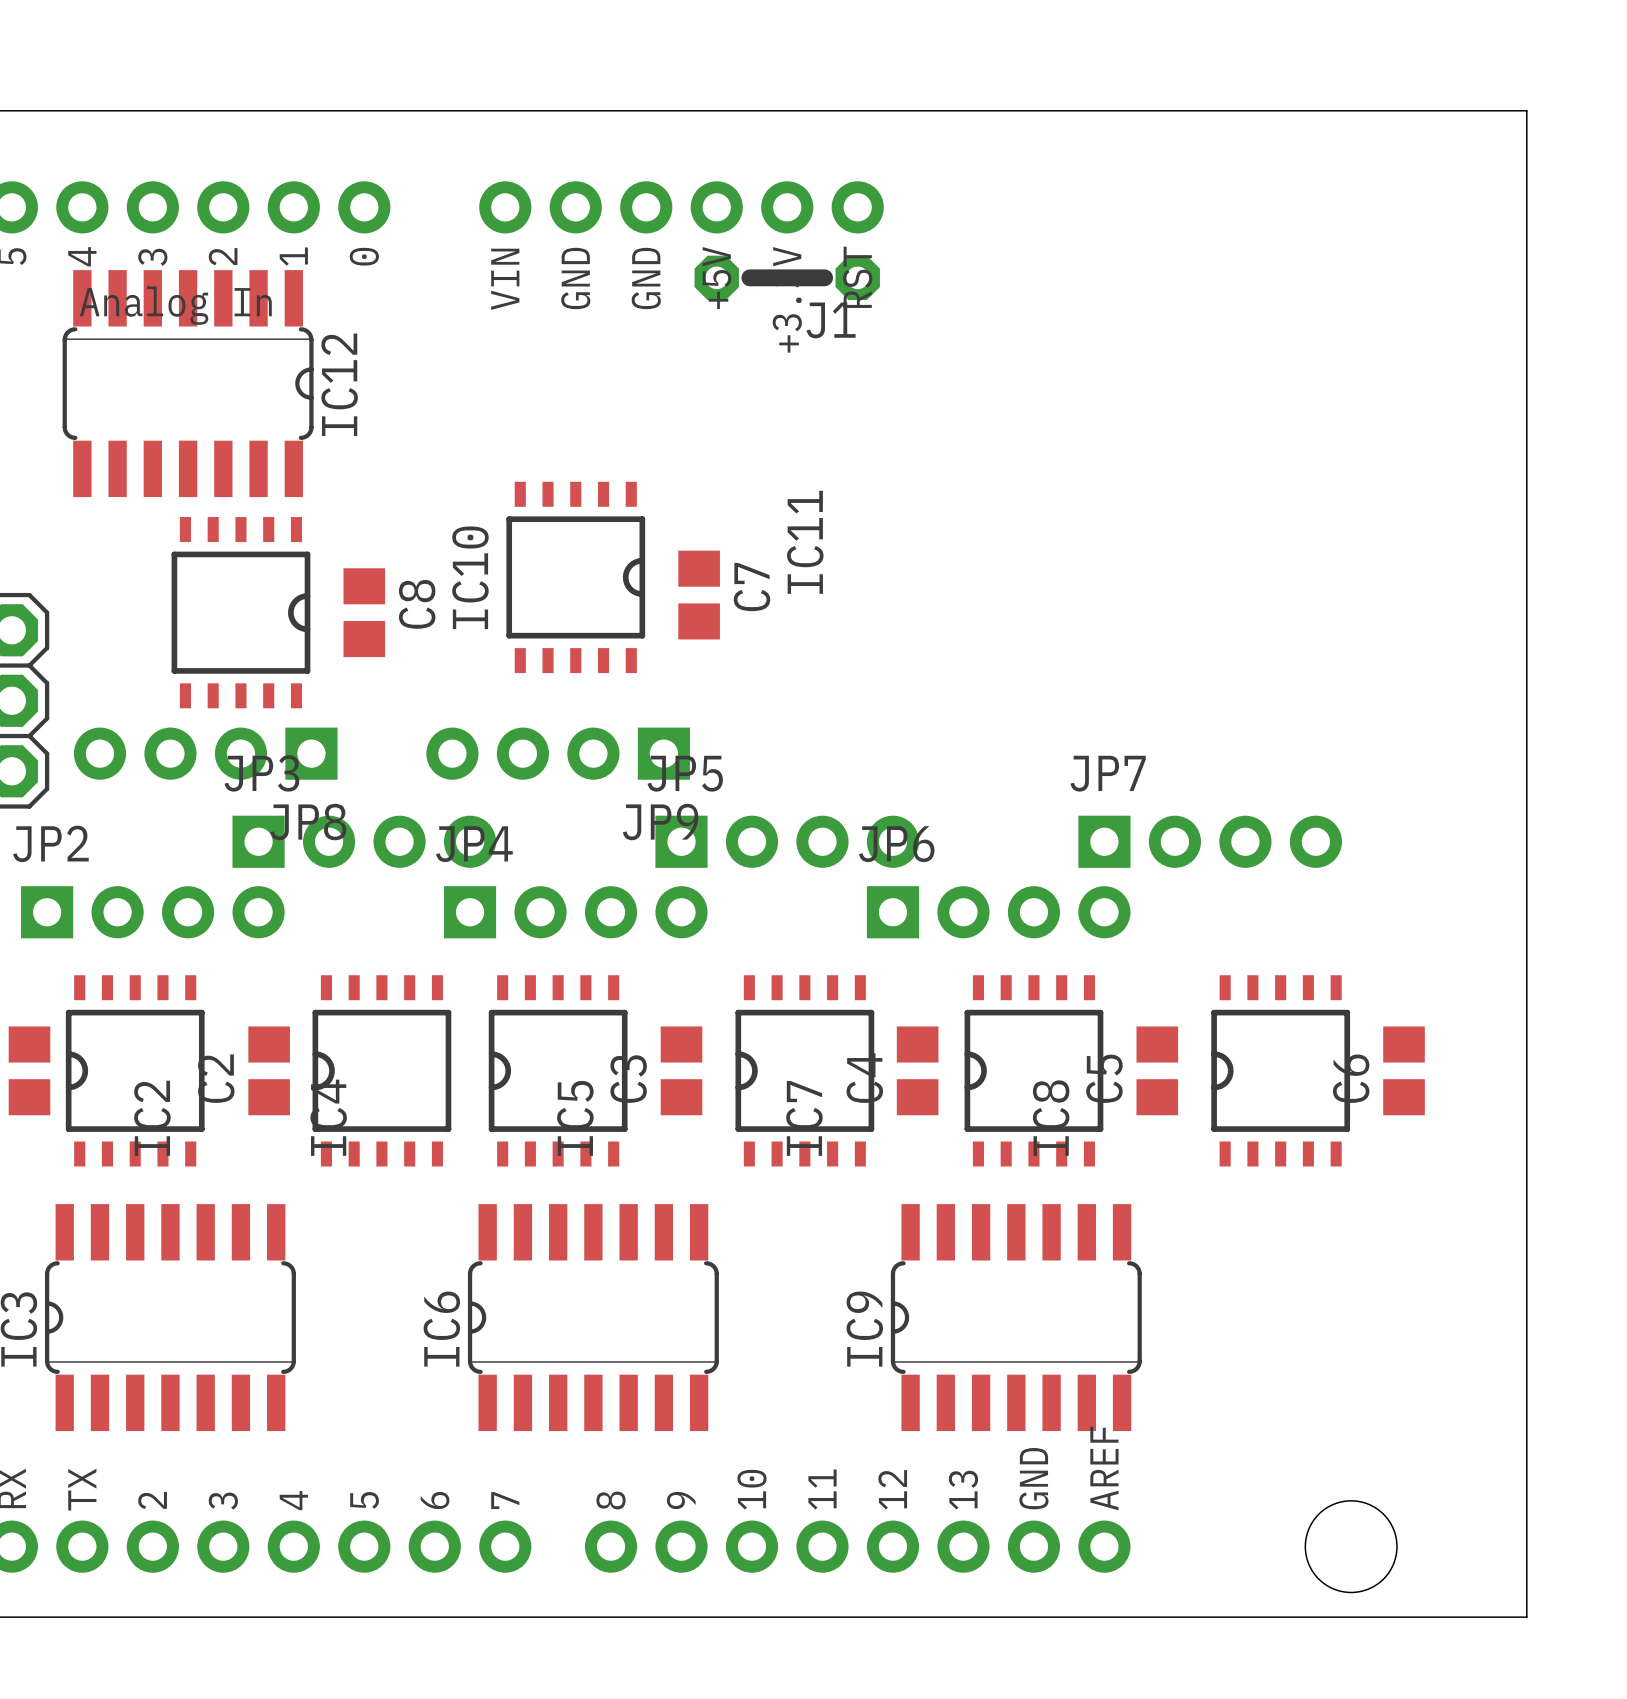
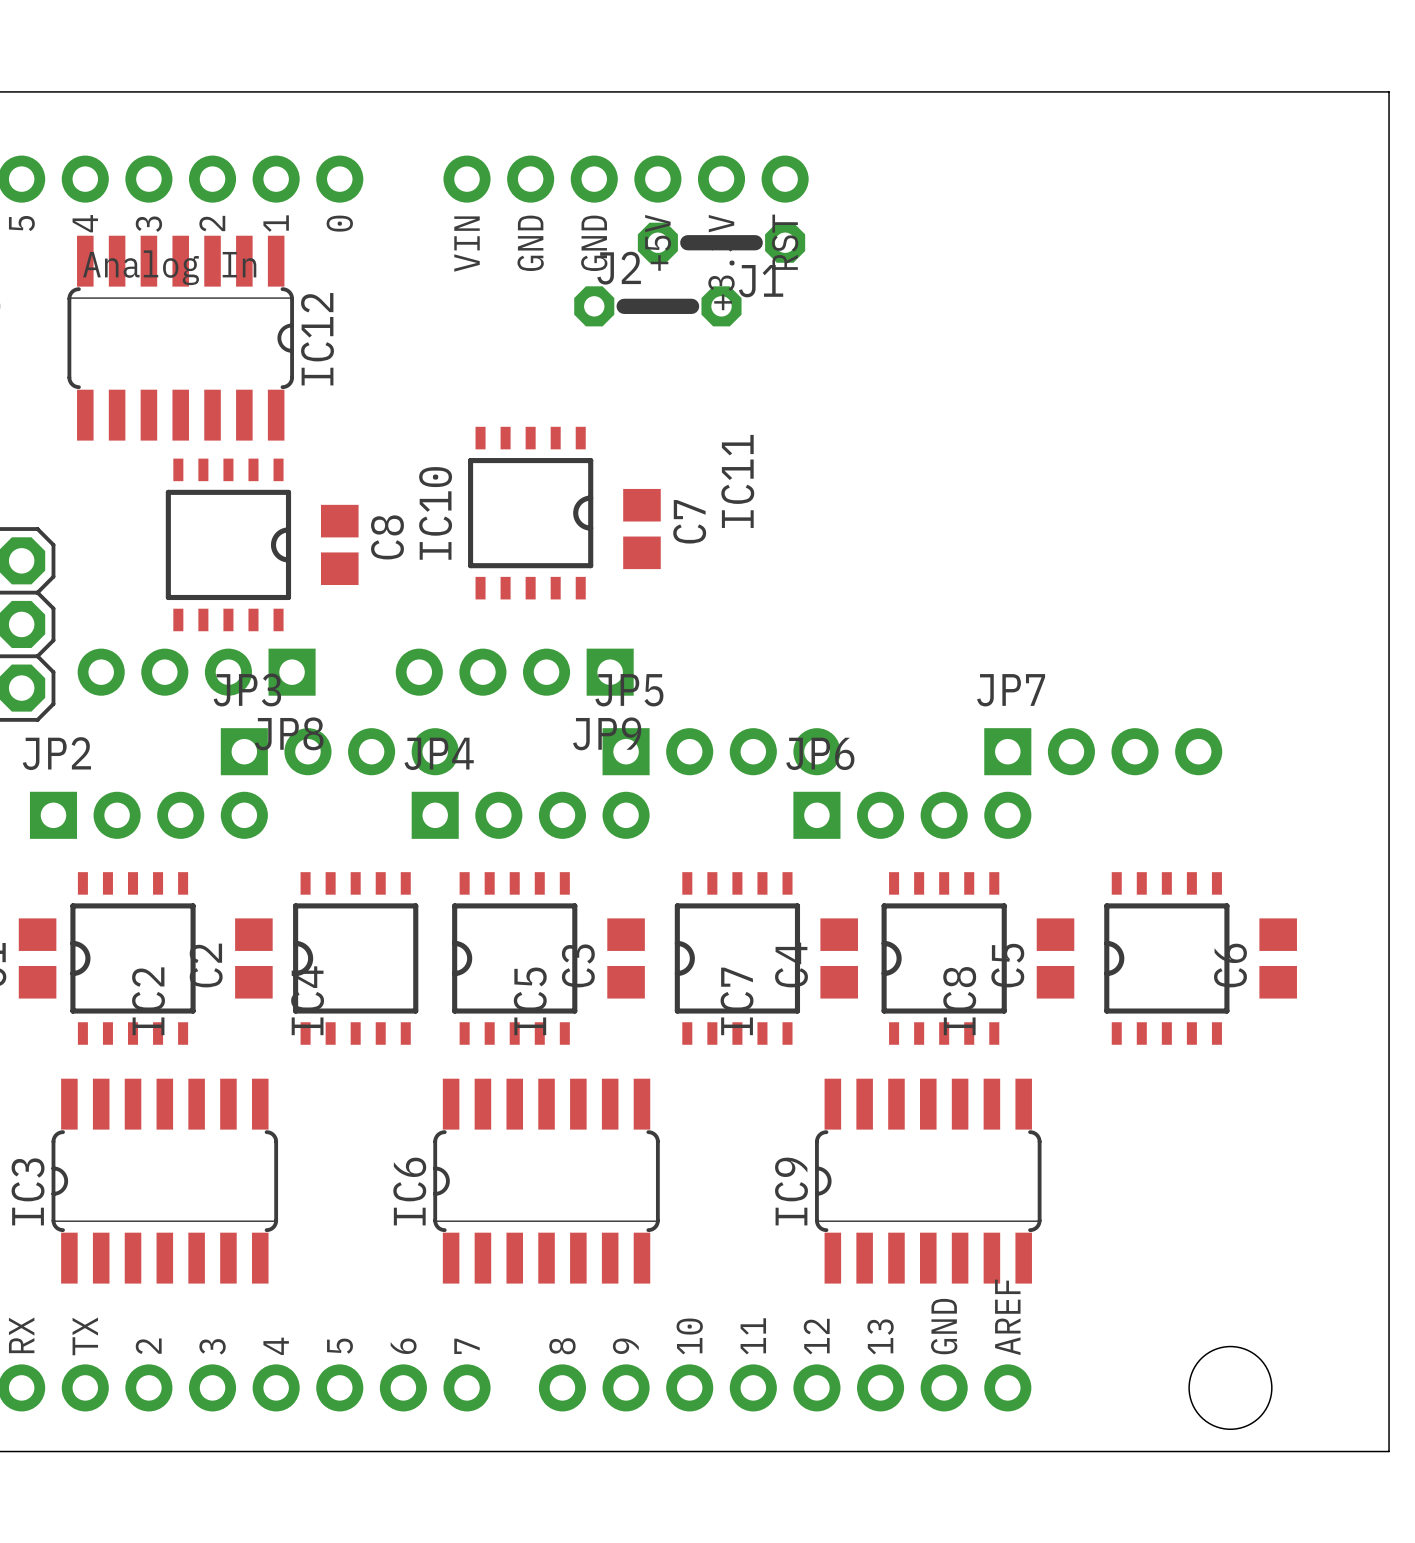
J2: none -> (657, 306)

